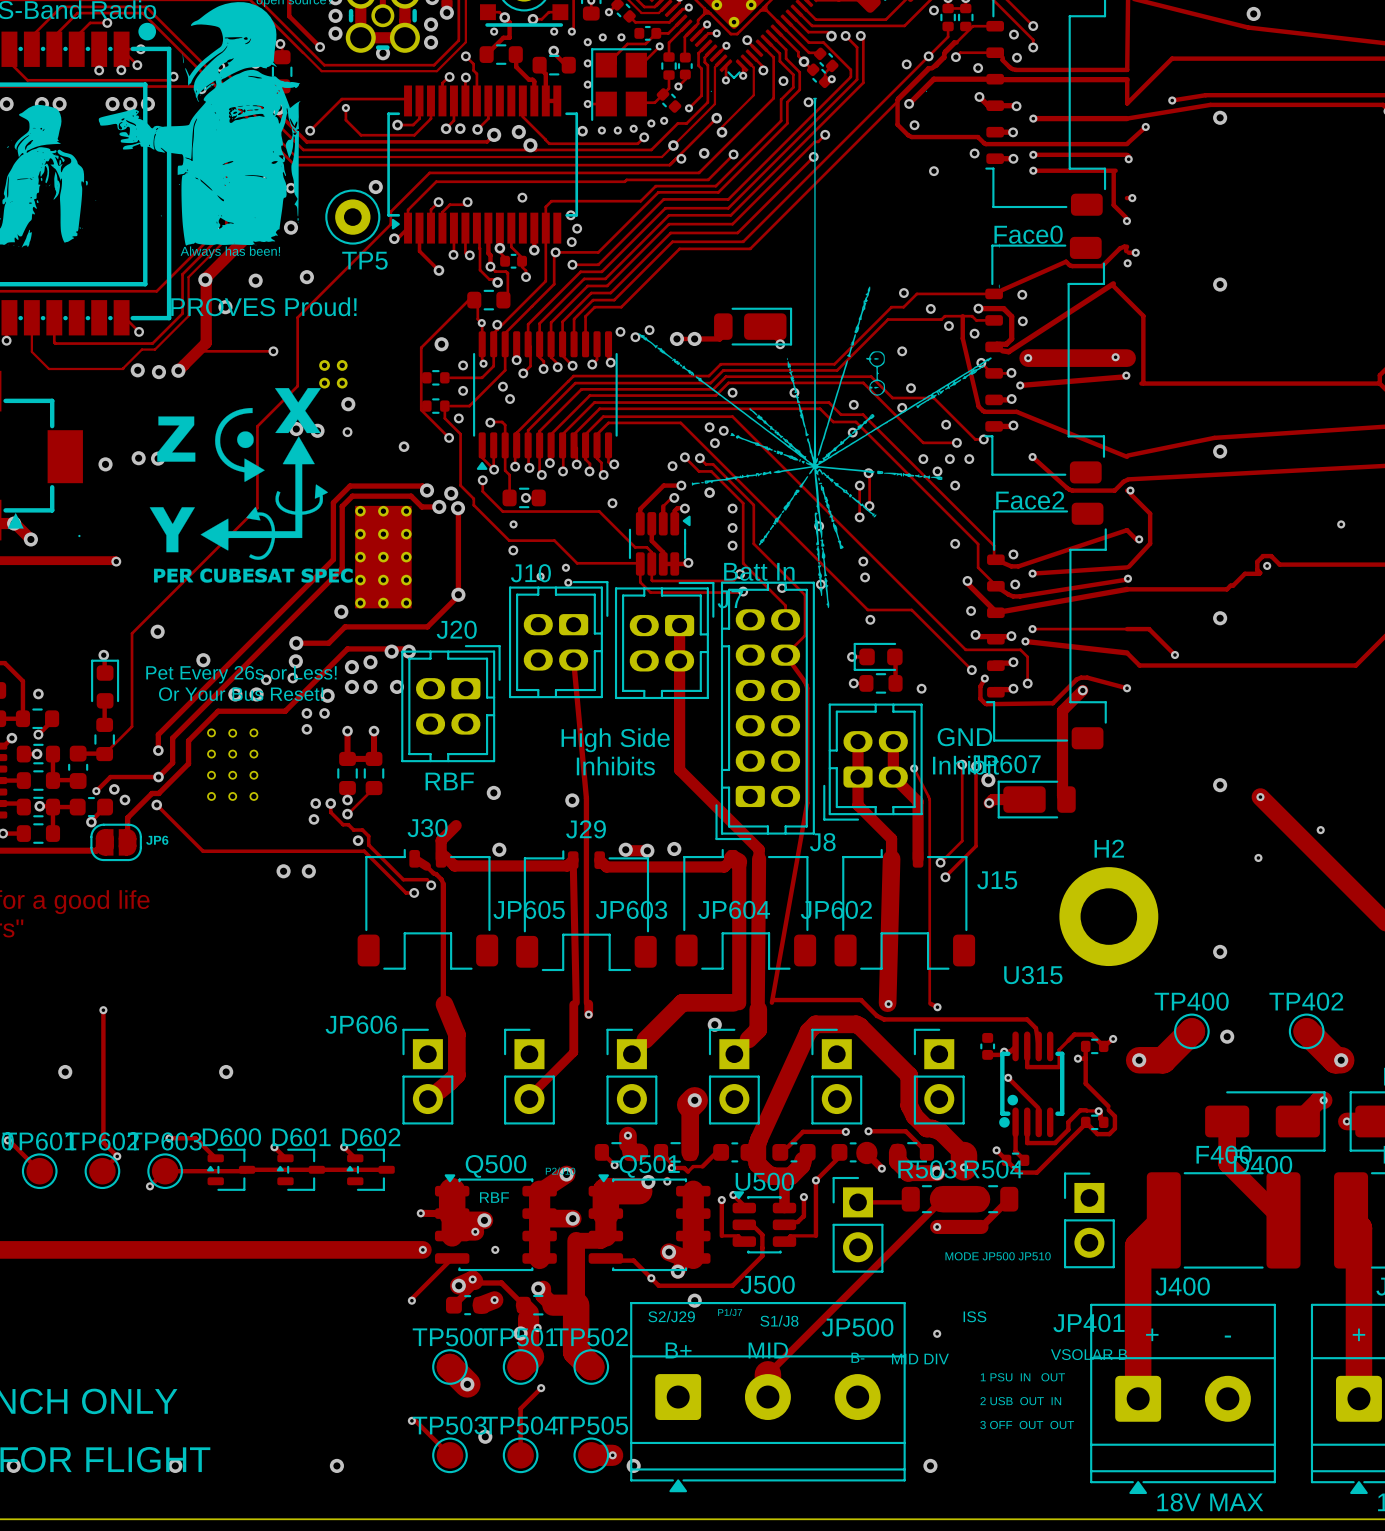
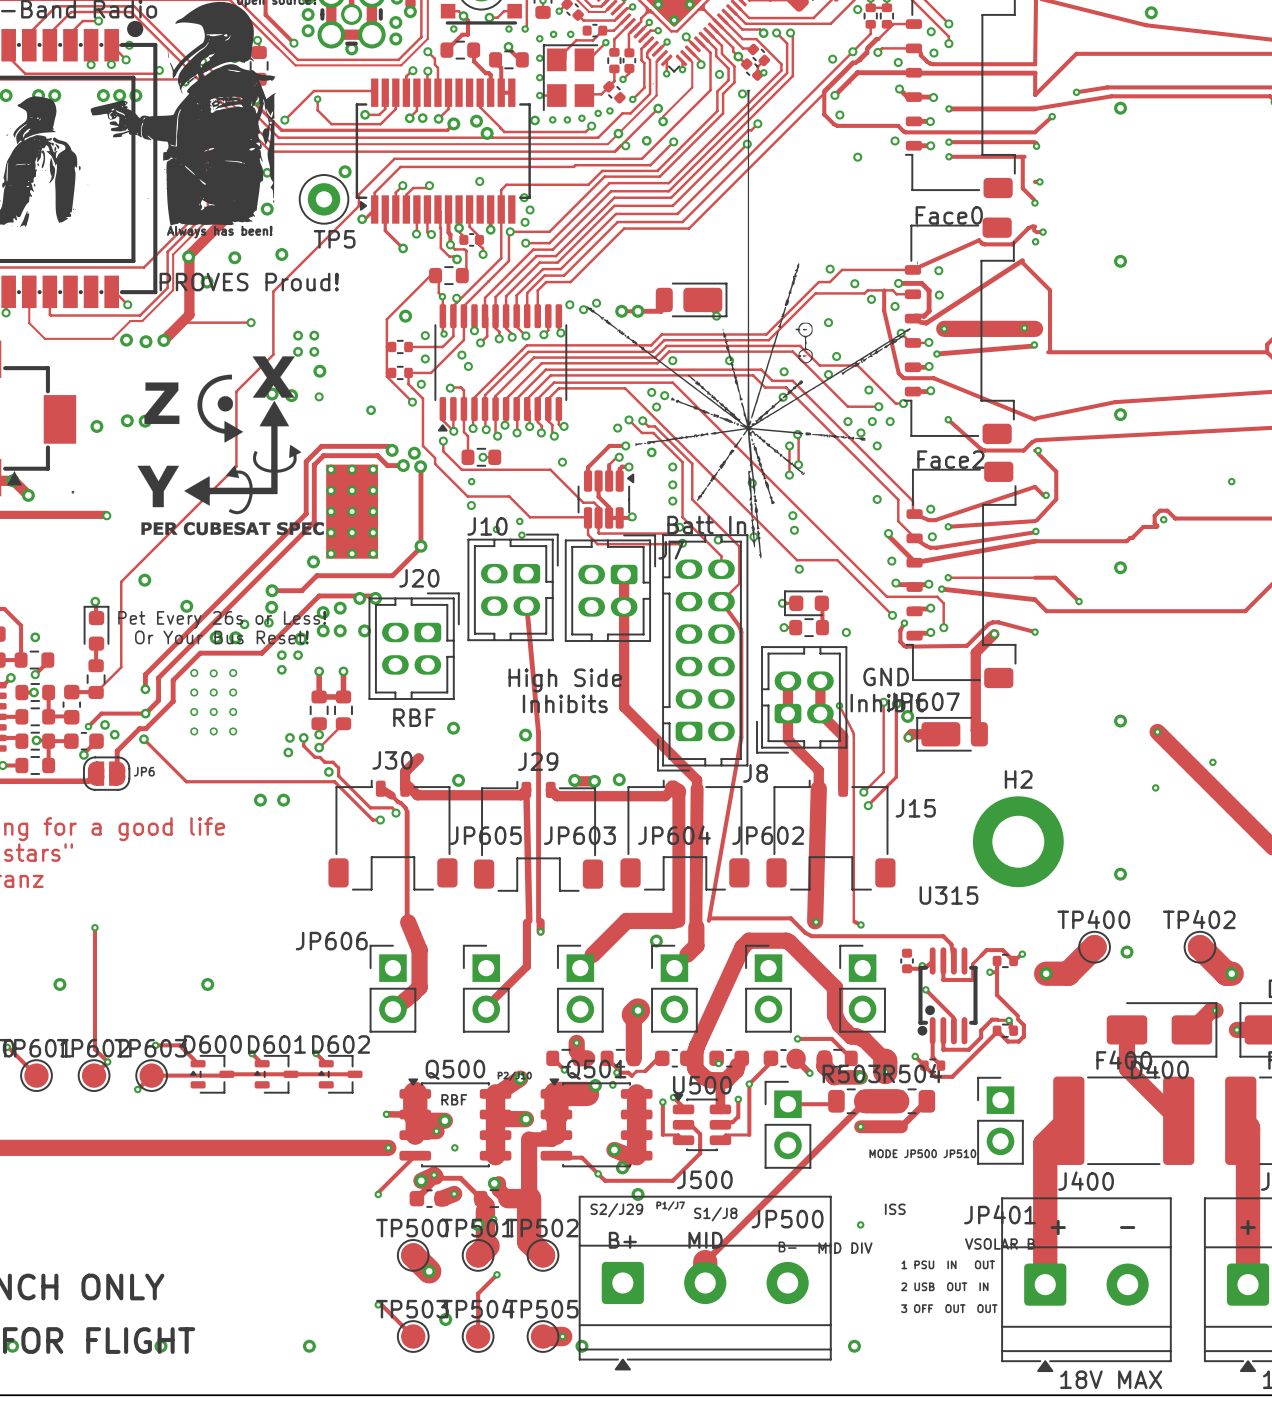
track: (845, 1131) (803, 1131) (788, 1146) -> none
via position: (845, 1131) -> (718, 1063)

